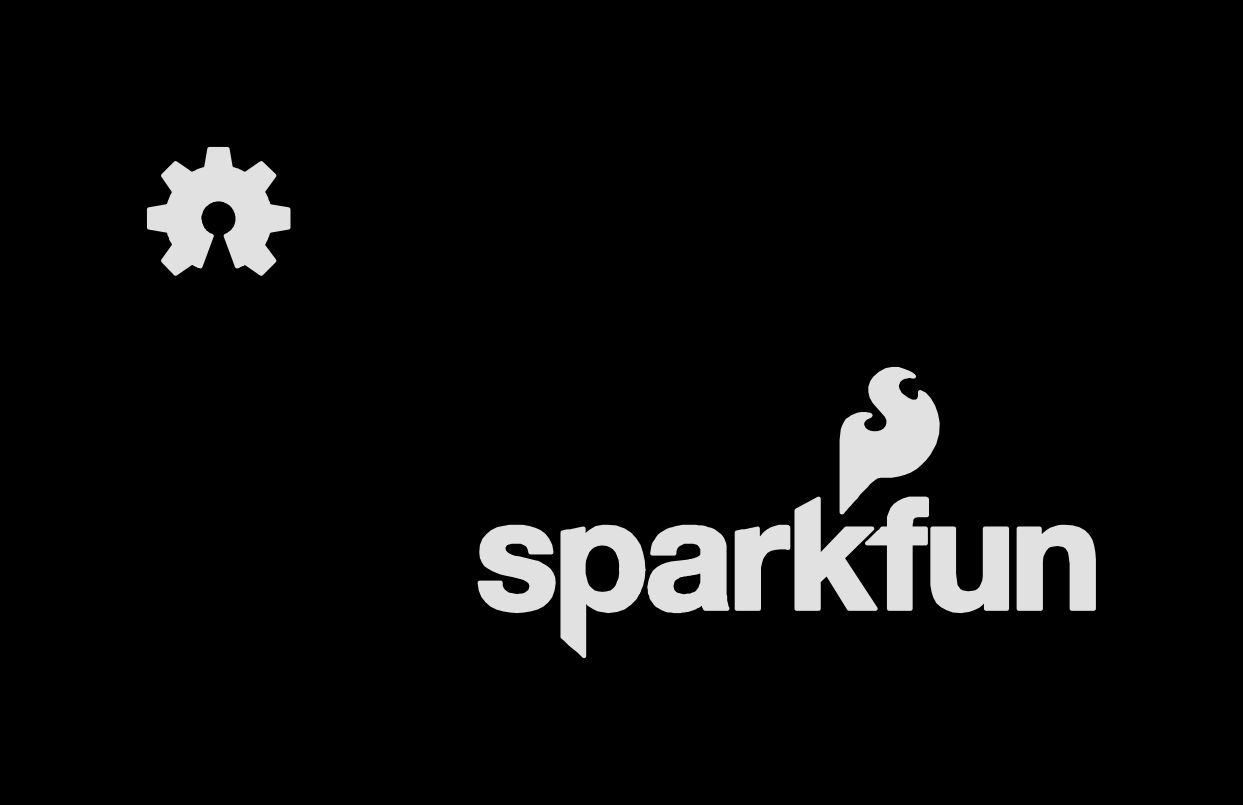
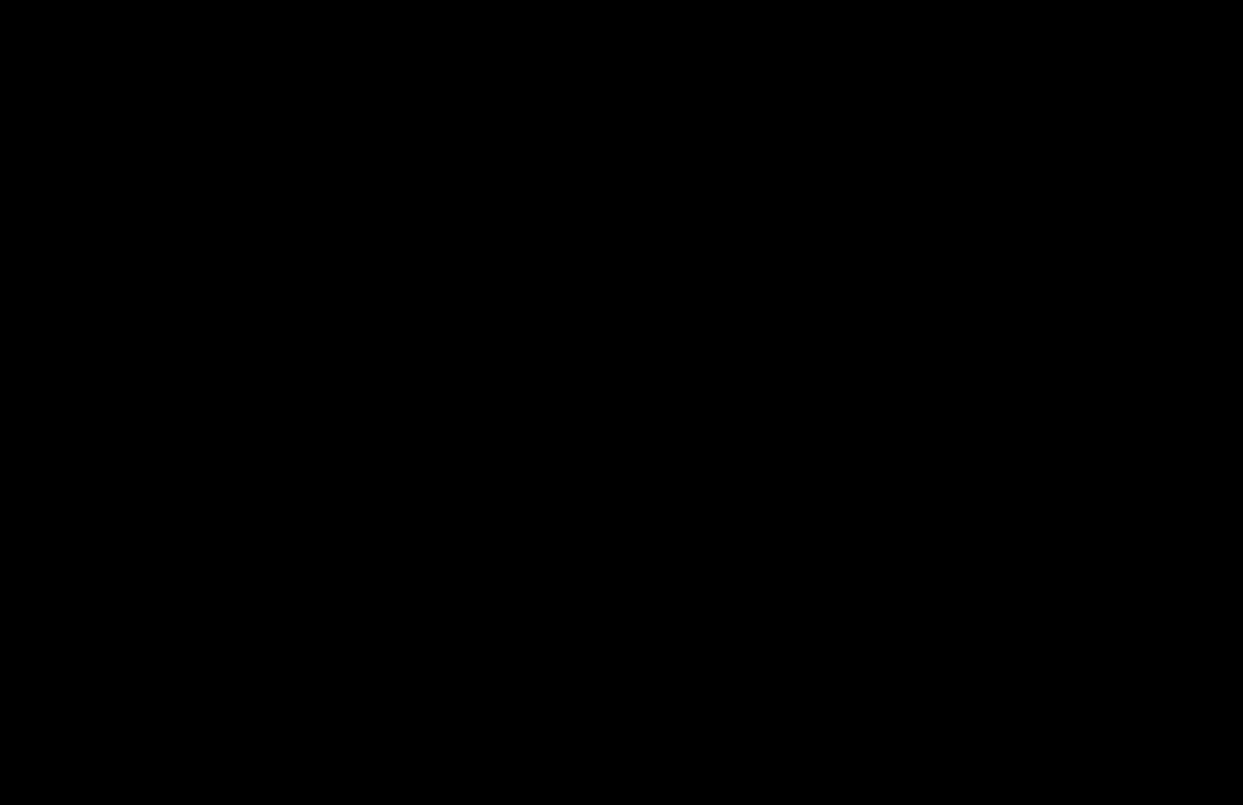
drawing: [146, 146, 291, 276] -> none
drawing: [477, 366, 1096, 659] -> none

